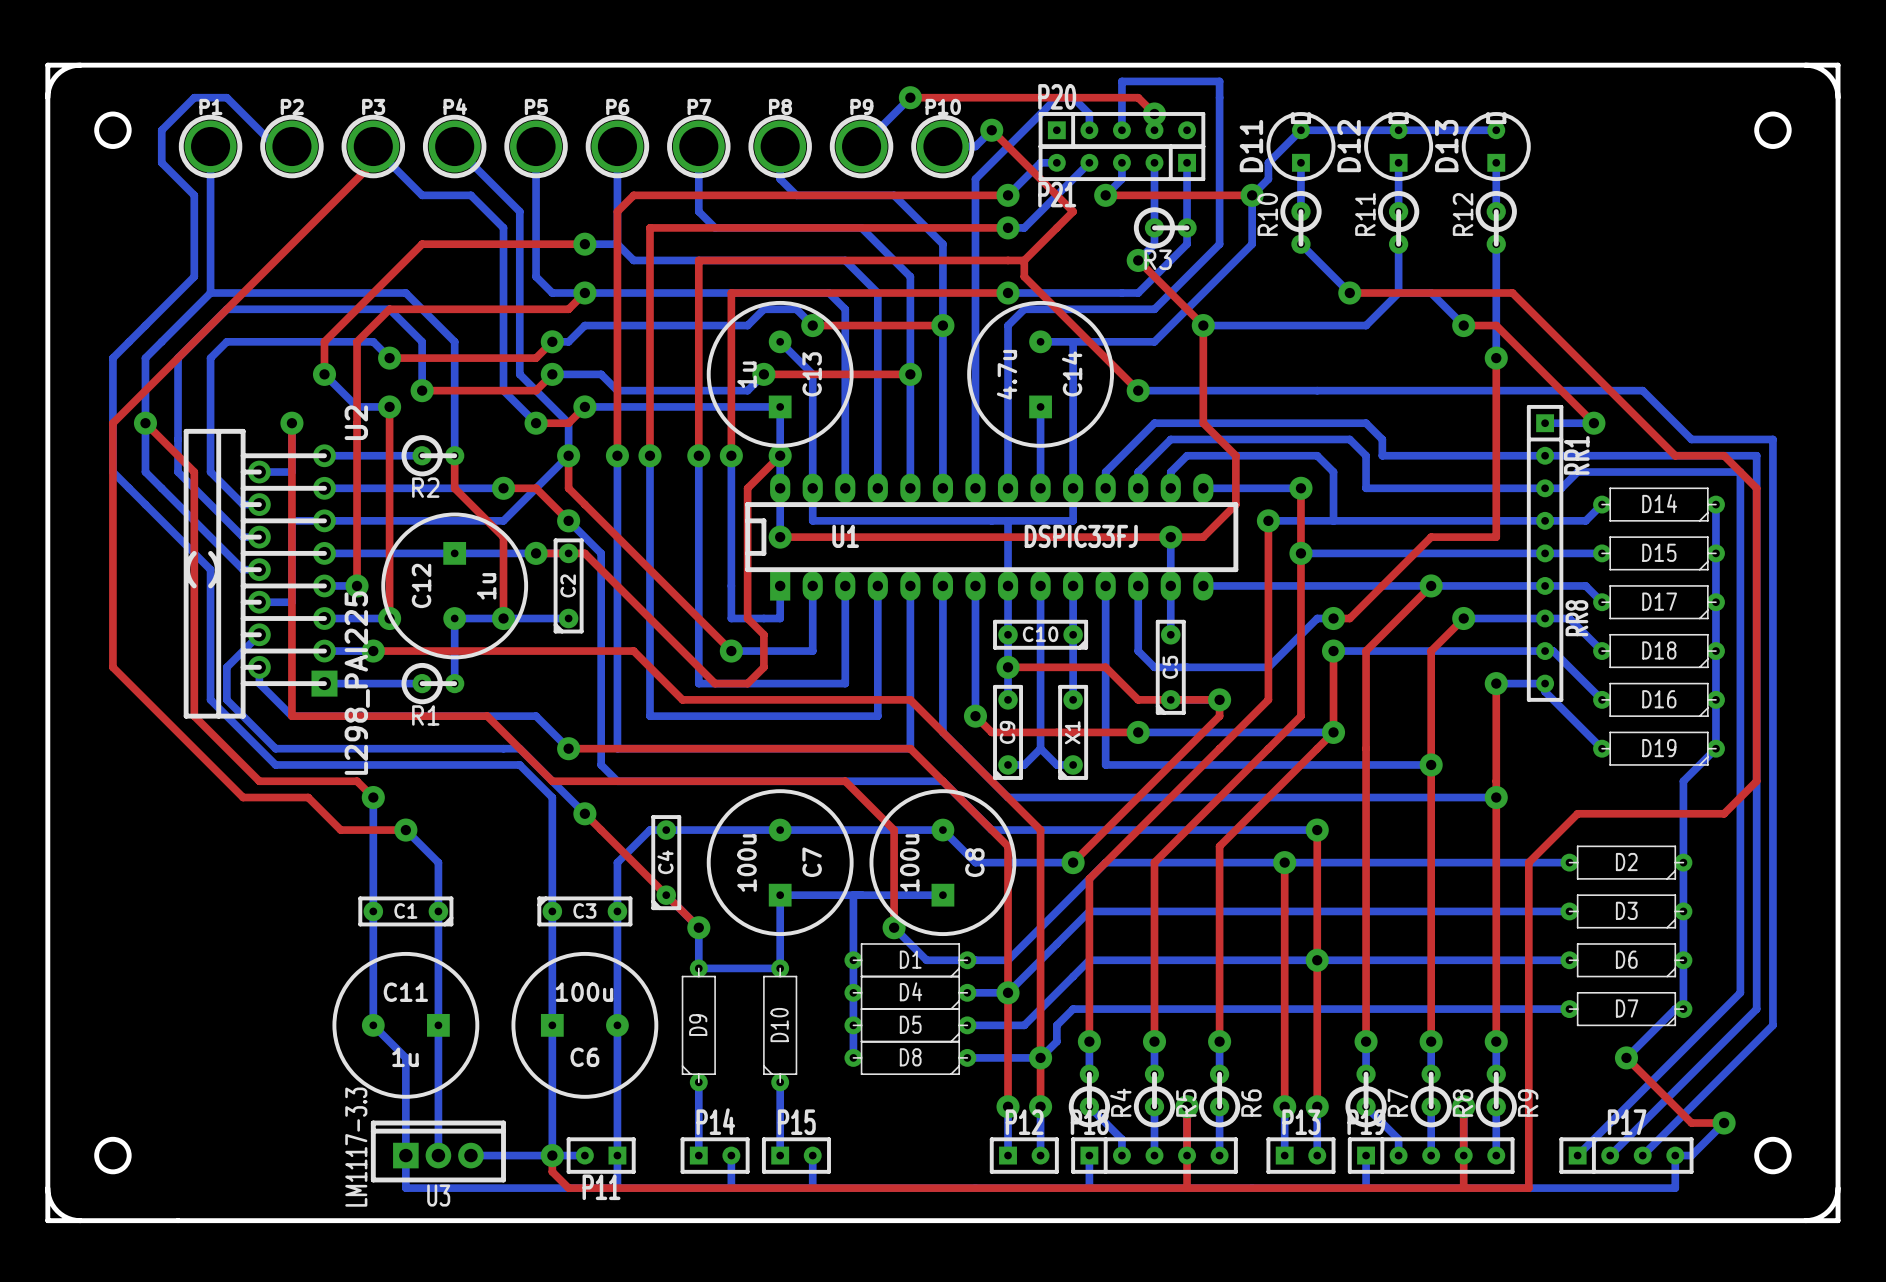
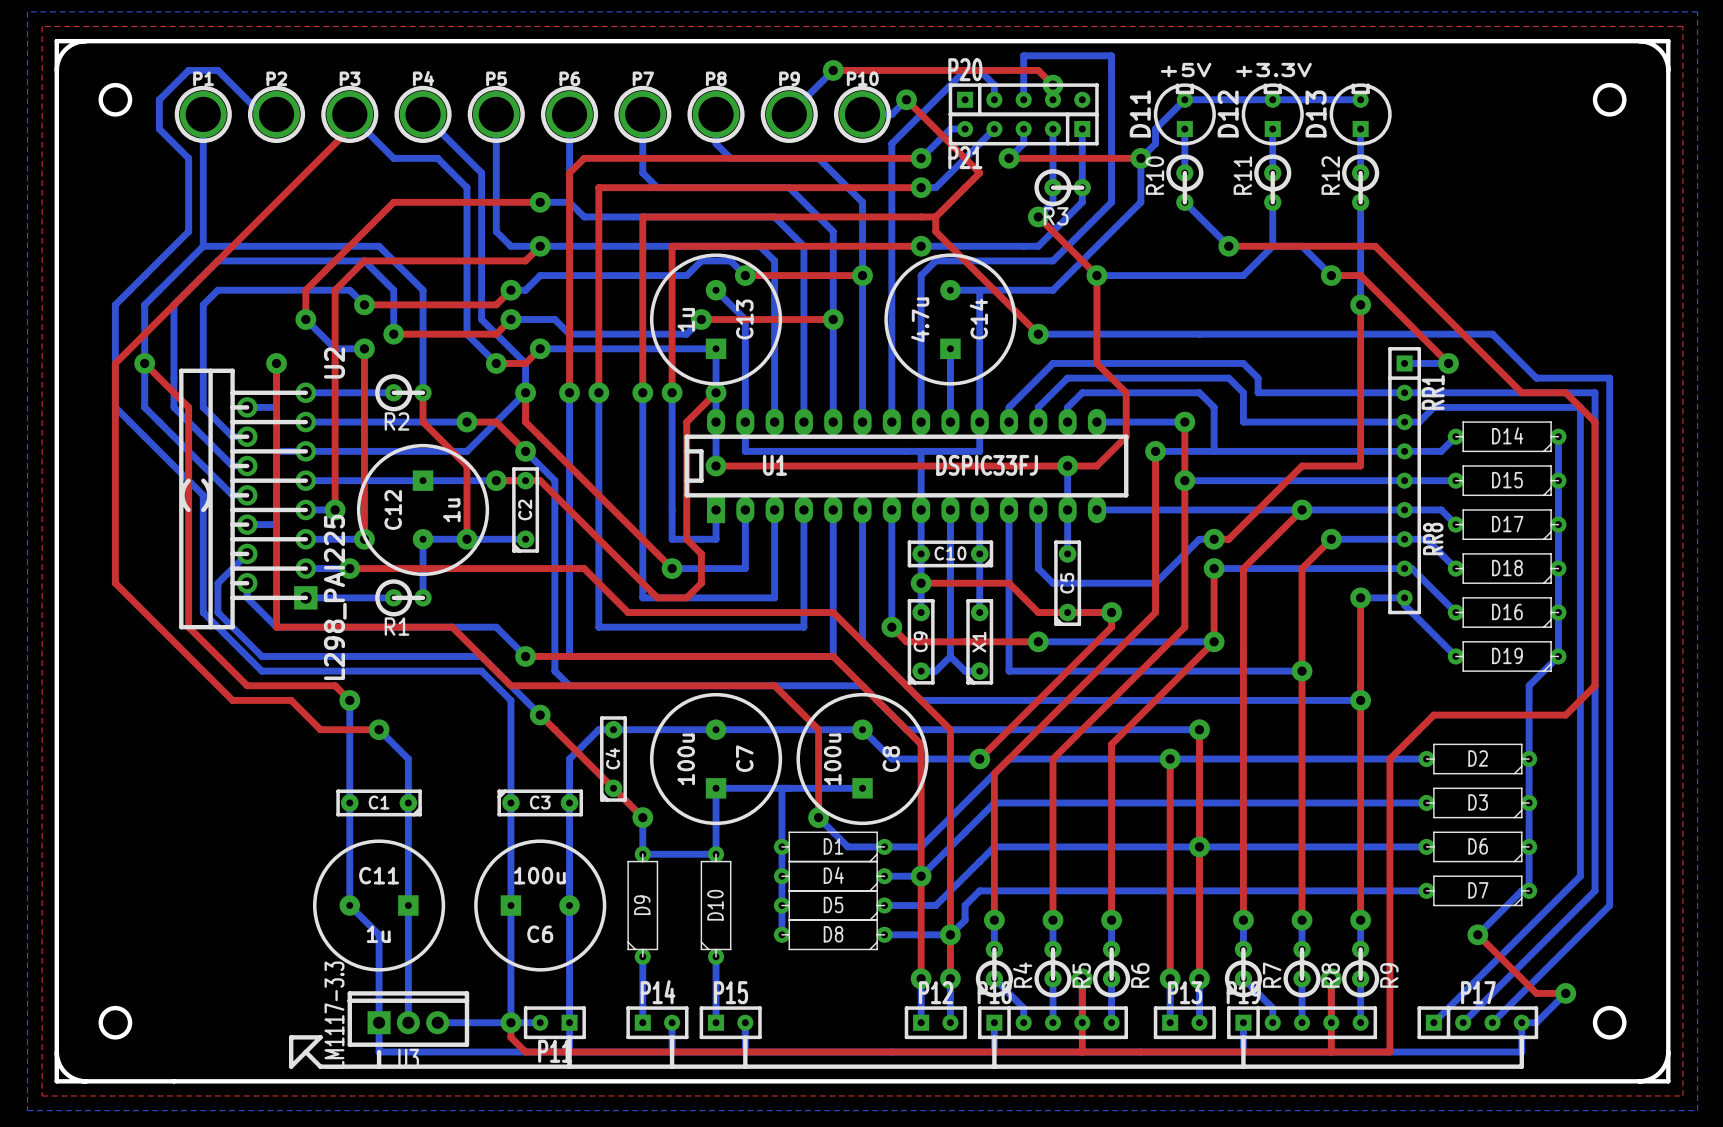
bottom zone outline: none -> (27, 11) (1697, 11) (1697, 1110) (27, 1110) (27, 11)
top zone outline: none -> (42, 26) (1682, 26) (1682, 1095) (42, 1095) (42, 26)
text: none -> +5V (1186, 70)
text: none -> +3.3V (1274, 70)
line: none -> (291, 1037) (291, 1066) (320, 1037) (291, 1037)
line: none -> (569, 1037) (569, 1066)
line: none -> (672, 1037) (672, 1066)
line: none -> (745, 1037) (745, 1066)
line: none -> (994, 1037) (994, 1066)
line: none -> (1243, 1037) (1243, 1066)
line: none -> (1521, 1037) (1521, 1066) (320, 1066) (305, 1052)
line: none -> (379, 1052) (379, 1066)

